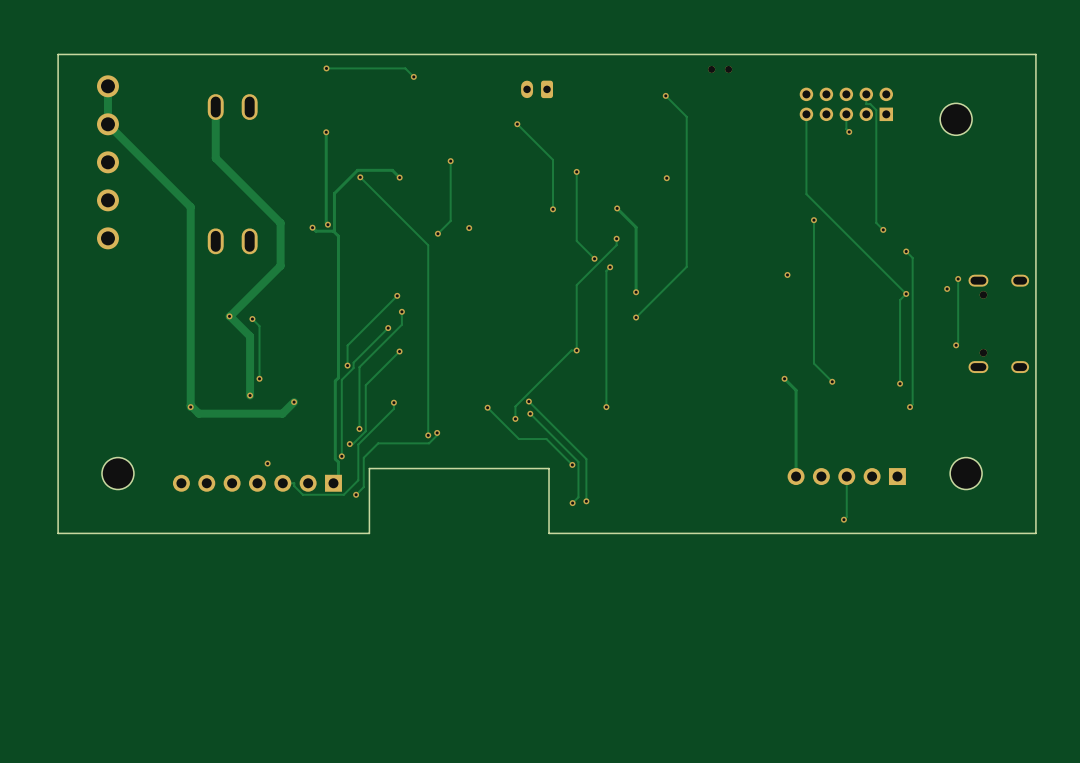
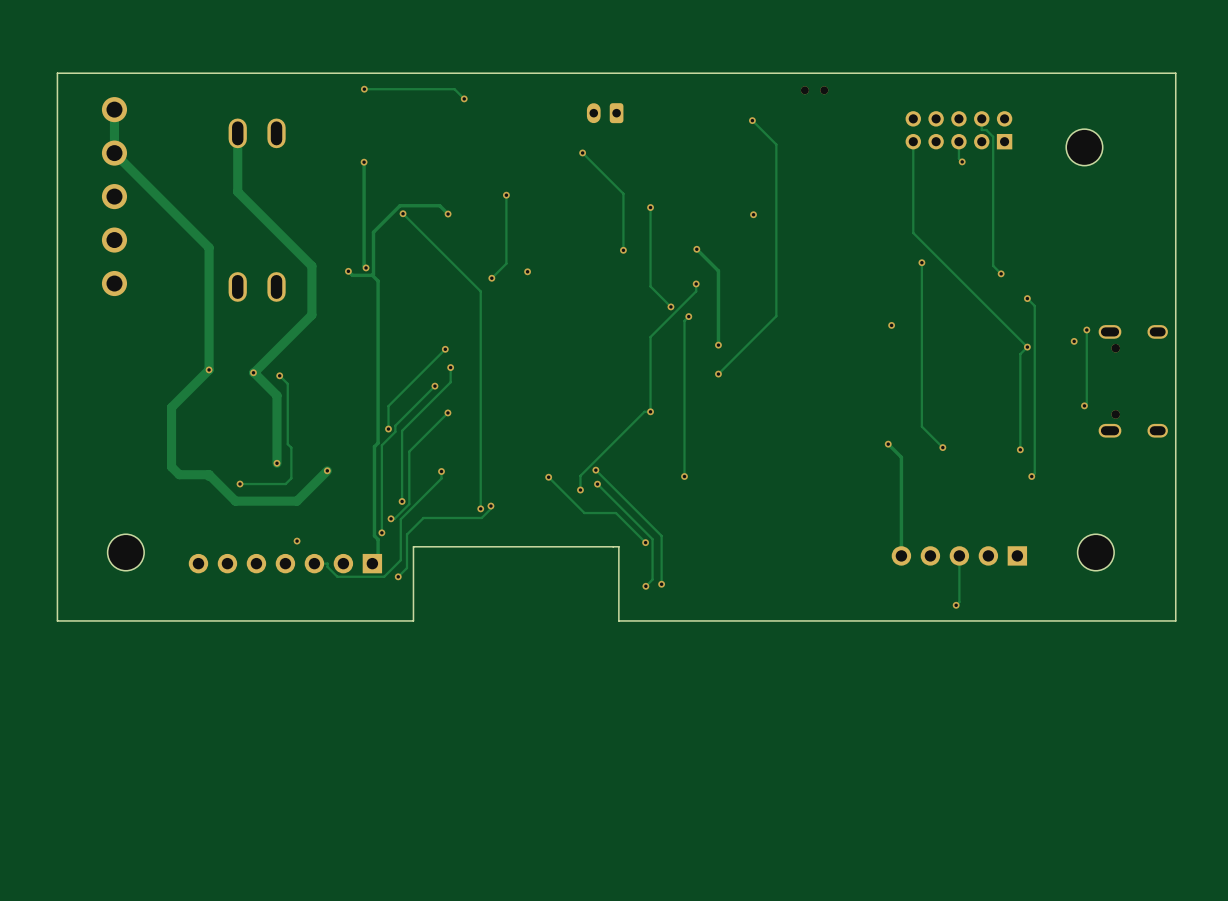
track: (190, 313) (190, 405) -> (209, 369) (171, 407) (171, 466) (179, 474) (209, 474)
via: none -> (209, 369)
via: (259, 378) -> none
via: (190, 407) -> none
track: (217, 413) (198, 413) -> (314, 484) (296, 501) (235, 501) (218, 484)
via: none -> (240, 484)
track width: thick (257, 413) (217, 413) -> thin (285, 484) (240, 484)
track: (282, 413) (257, 413) -> (287, 444) (291, 447) (291, 478) (285, 484)

